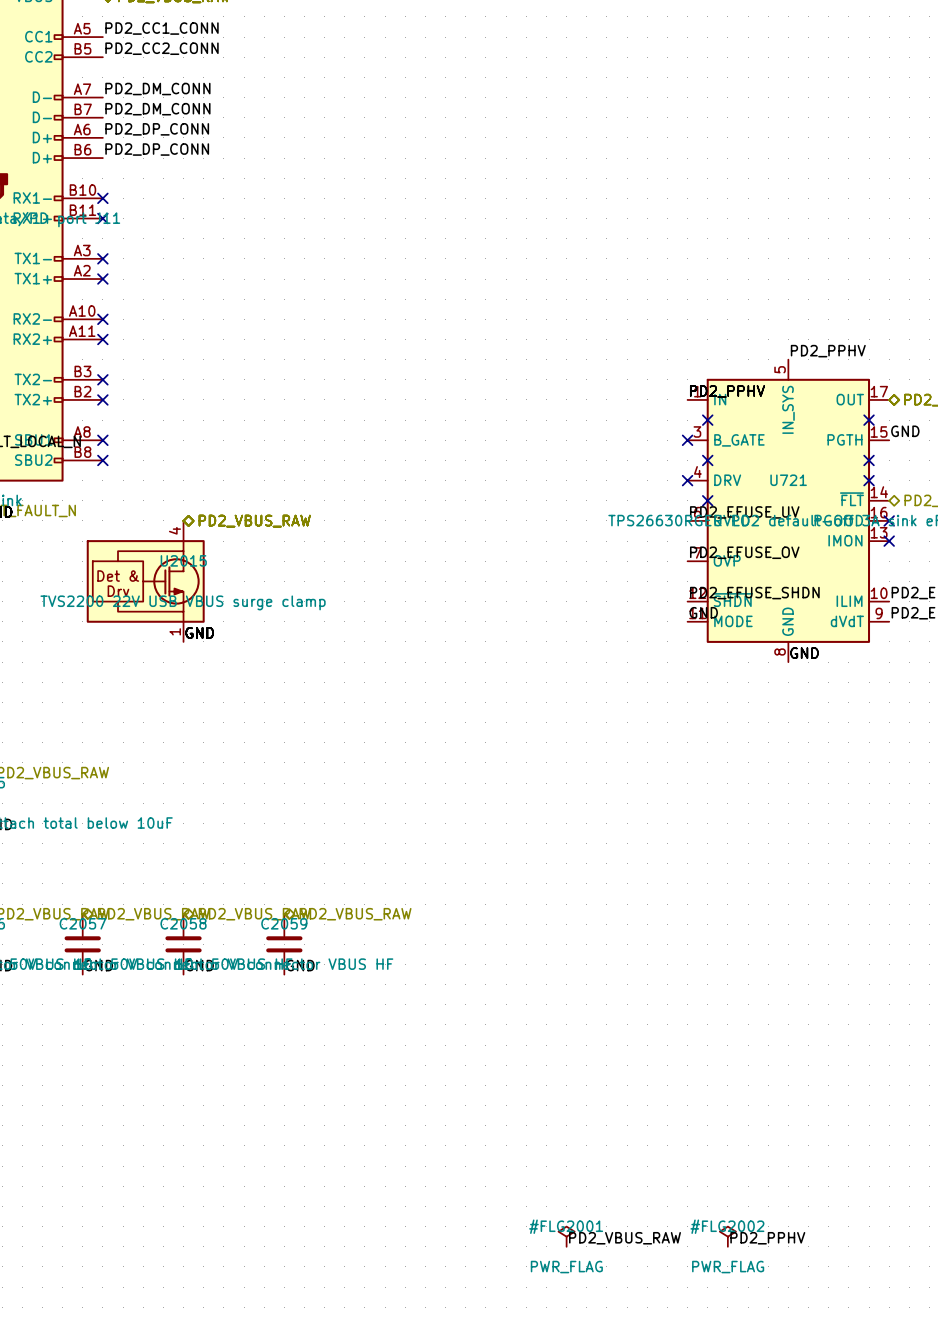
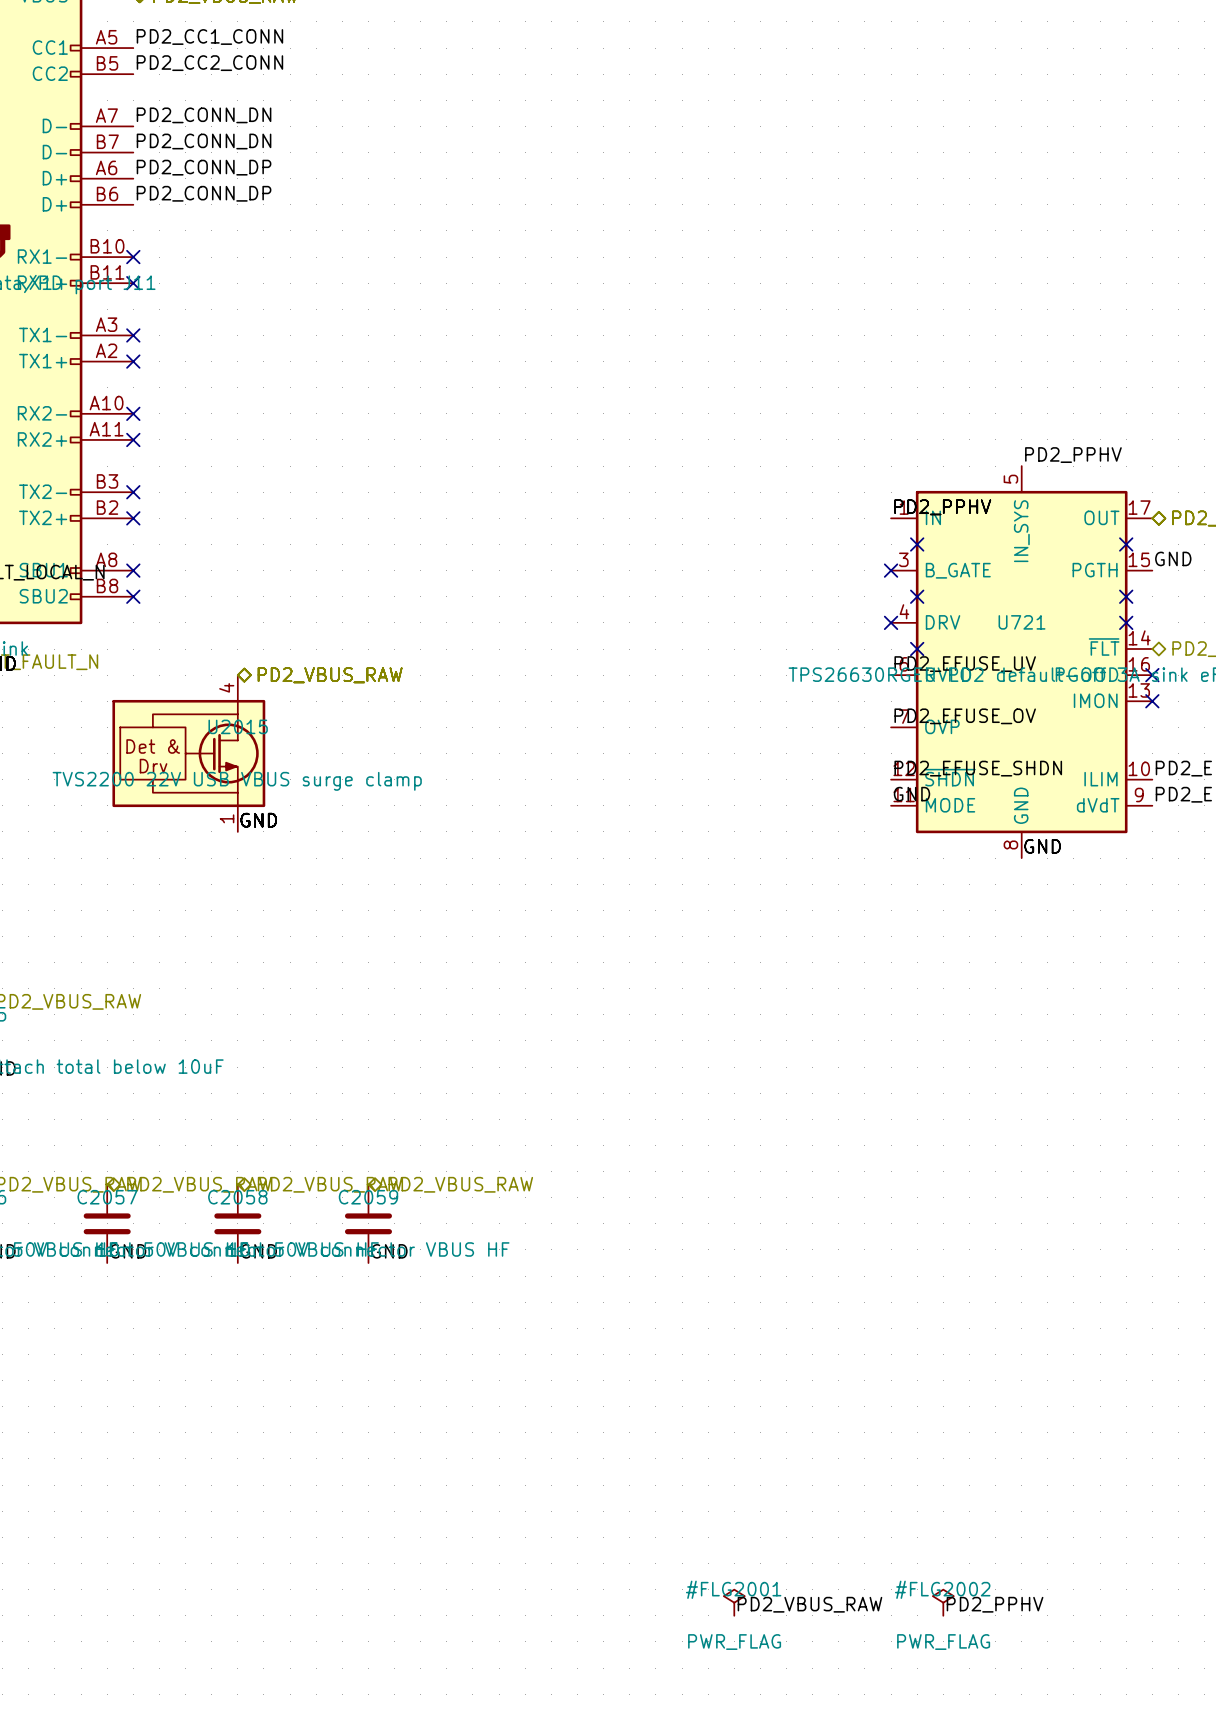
label: PD2_DM_CONN (157, 89) -> PD2_CONN_DN (204, 115)
label: PD2_DM_CONN (157, 109) -> PD2_CONN_DN (204, 141)
label: PD2_DP_CONN (157, 129) -> PD2_CONN_DP (204, 167)
label: PD2_DP_CONN (157, 149) -> PD2_CONN_DP (204, 193)

